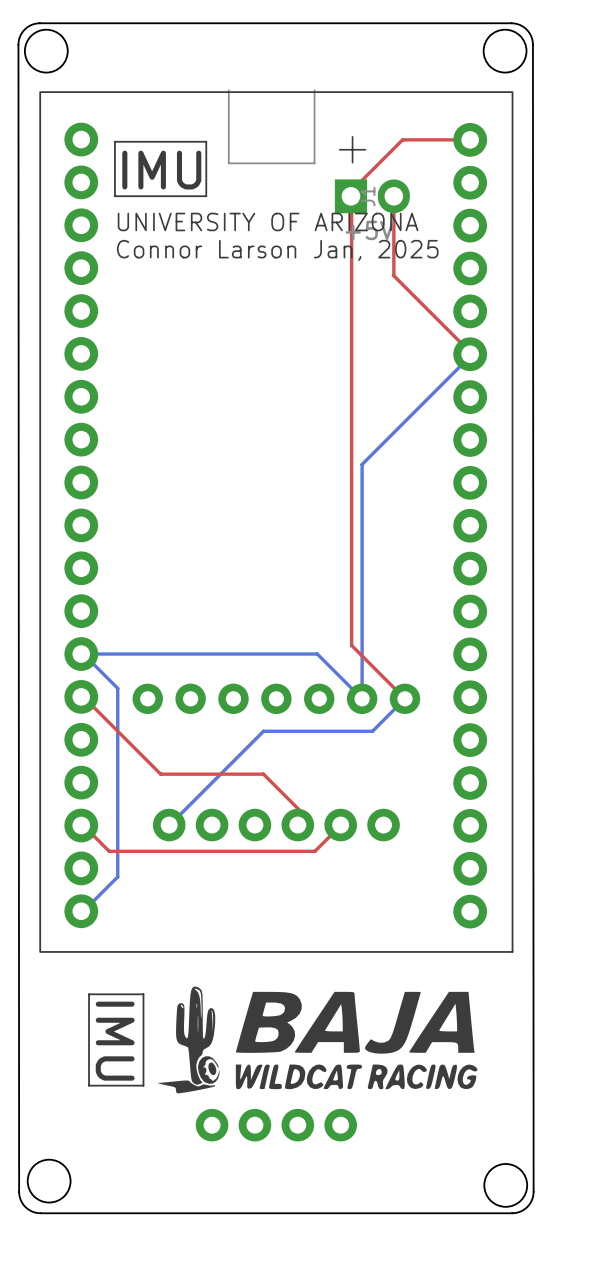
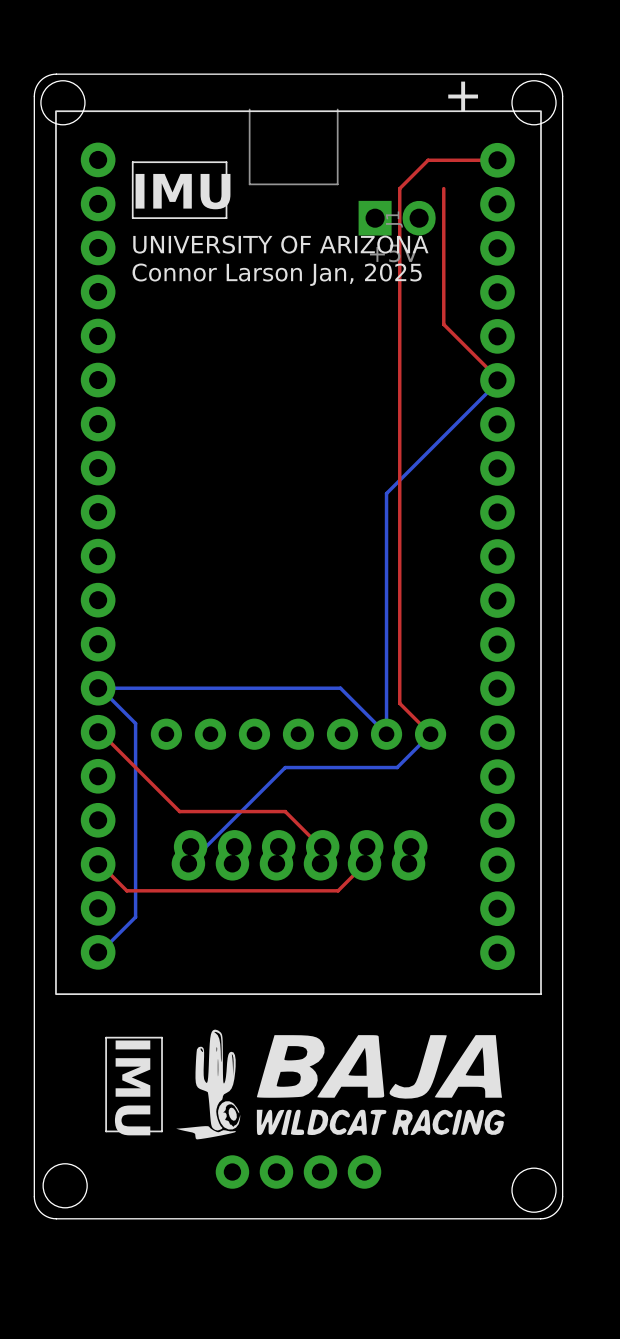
board edge: (39, 23) (511, 23) (522, 26) (531, 37) (533, 1191) (528, 1205) (519, 1212) (40, 1213) (27, 1208) (20, 1198) (18, 44) (19, 37) (24, 29) (32, 24) (39, 23) -> (56, 74) (46, 76) (40, 80) (36, 86) (34, 96) (34, 1196) (36, 1206) (44, 1215) (56, 1218) (540, 1218) (550, 1216) (559, 1208) (562, 1196) (562, 96) (560, 86) (552, 77) (540, 74) (56, 74)
round board edge position: (46, 51) -> (62, 102)
round board edge position: (505, 51) -> (534, 102)
text position: + (352, 149) -> + (463, 96)
top track: (374, 167) (351, 190) (351, 645) (374, 668) -> (399, 188) (399, 703)
top track: (393, 191) (393, 275) (417, 299) -> (443, 188) (443, 324)
part: none -> (300, 846)
round board edge position: (49, 1181) -> (65, 1185)
round board edge position: (505, 1185) -> (534, 1190)

